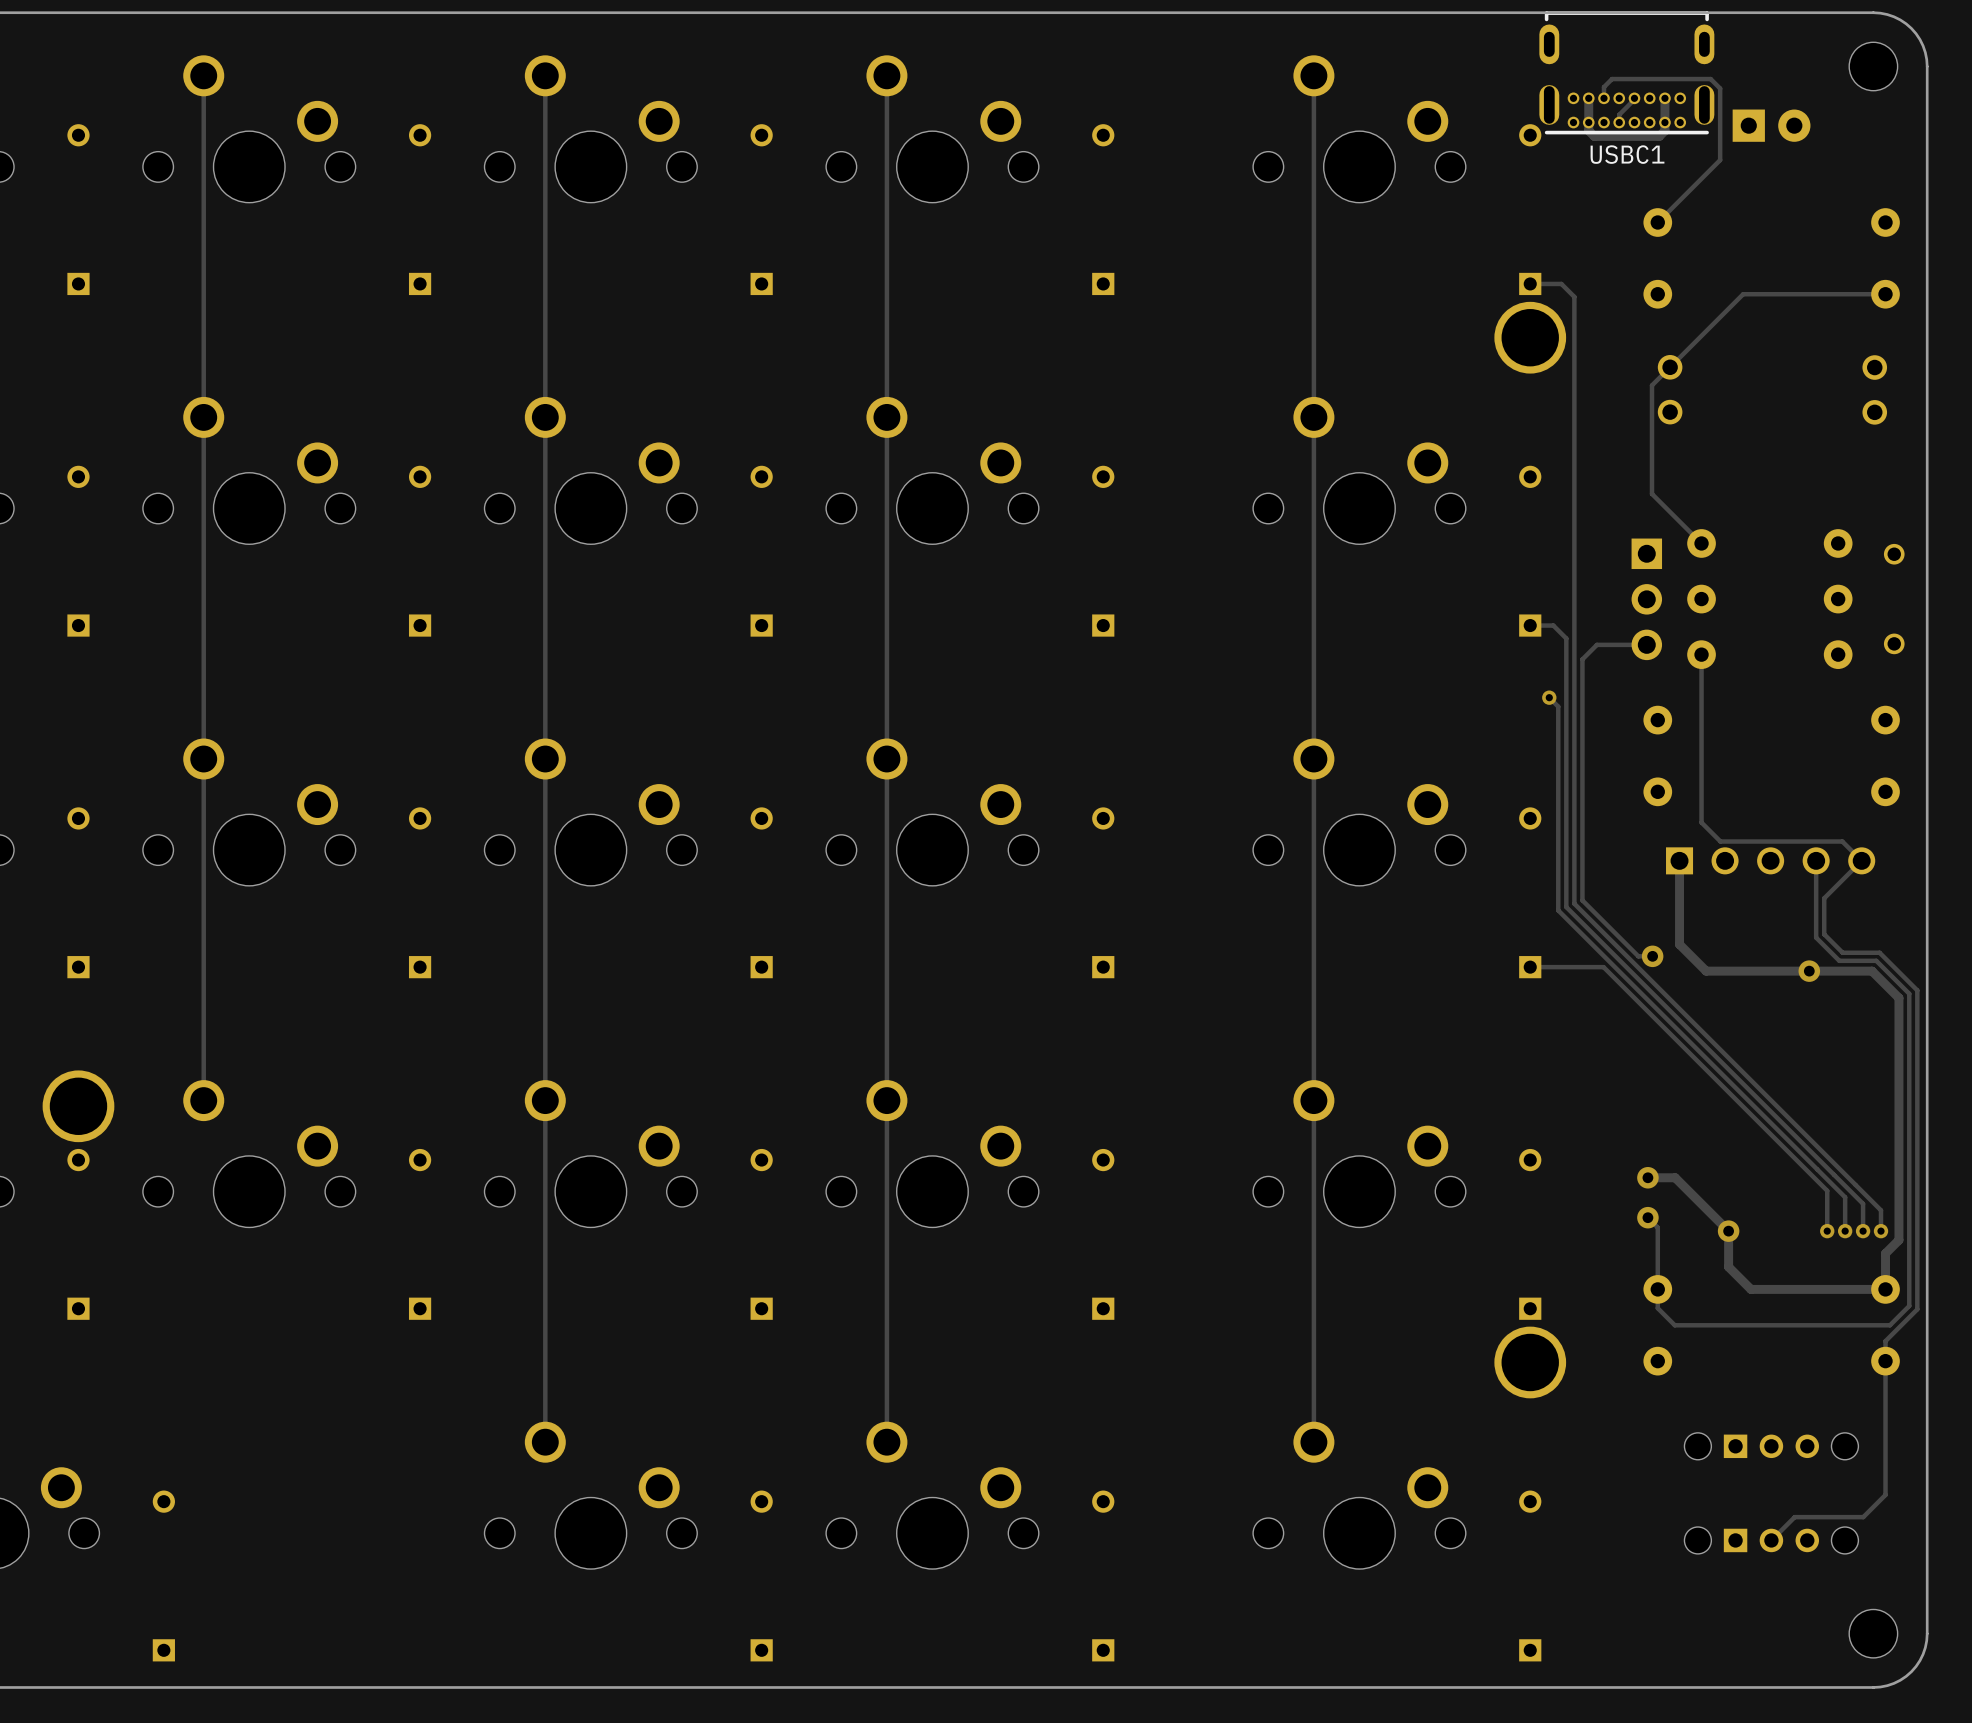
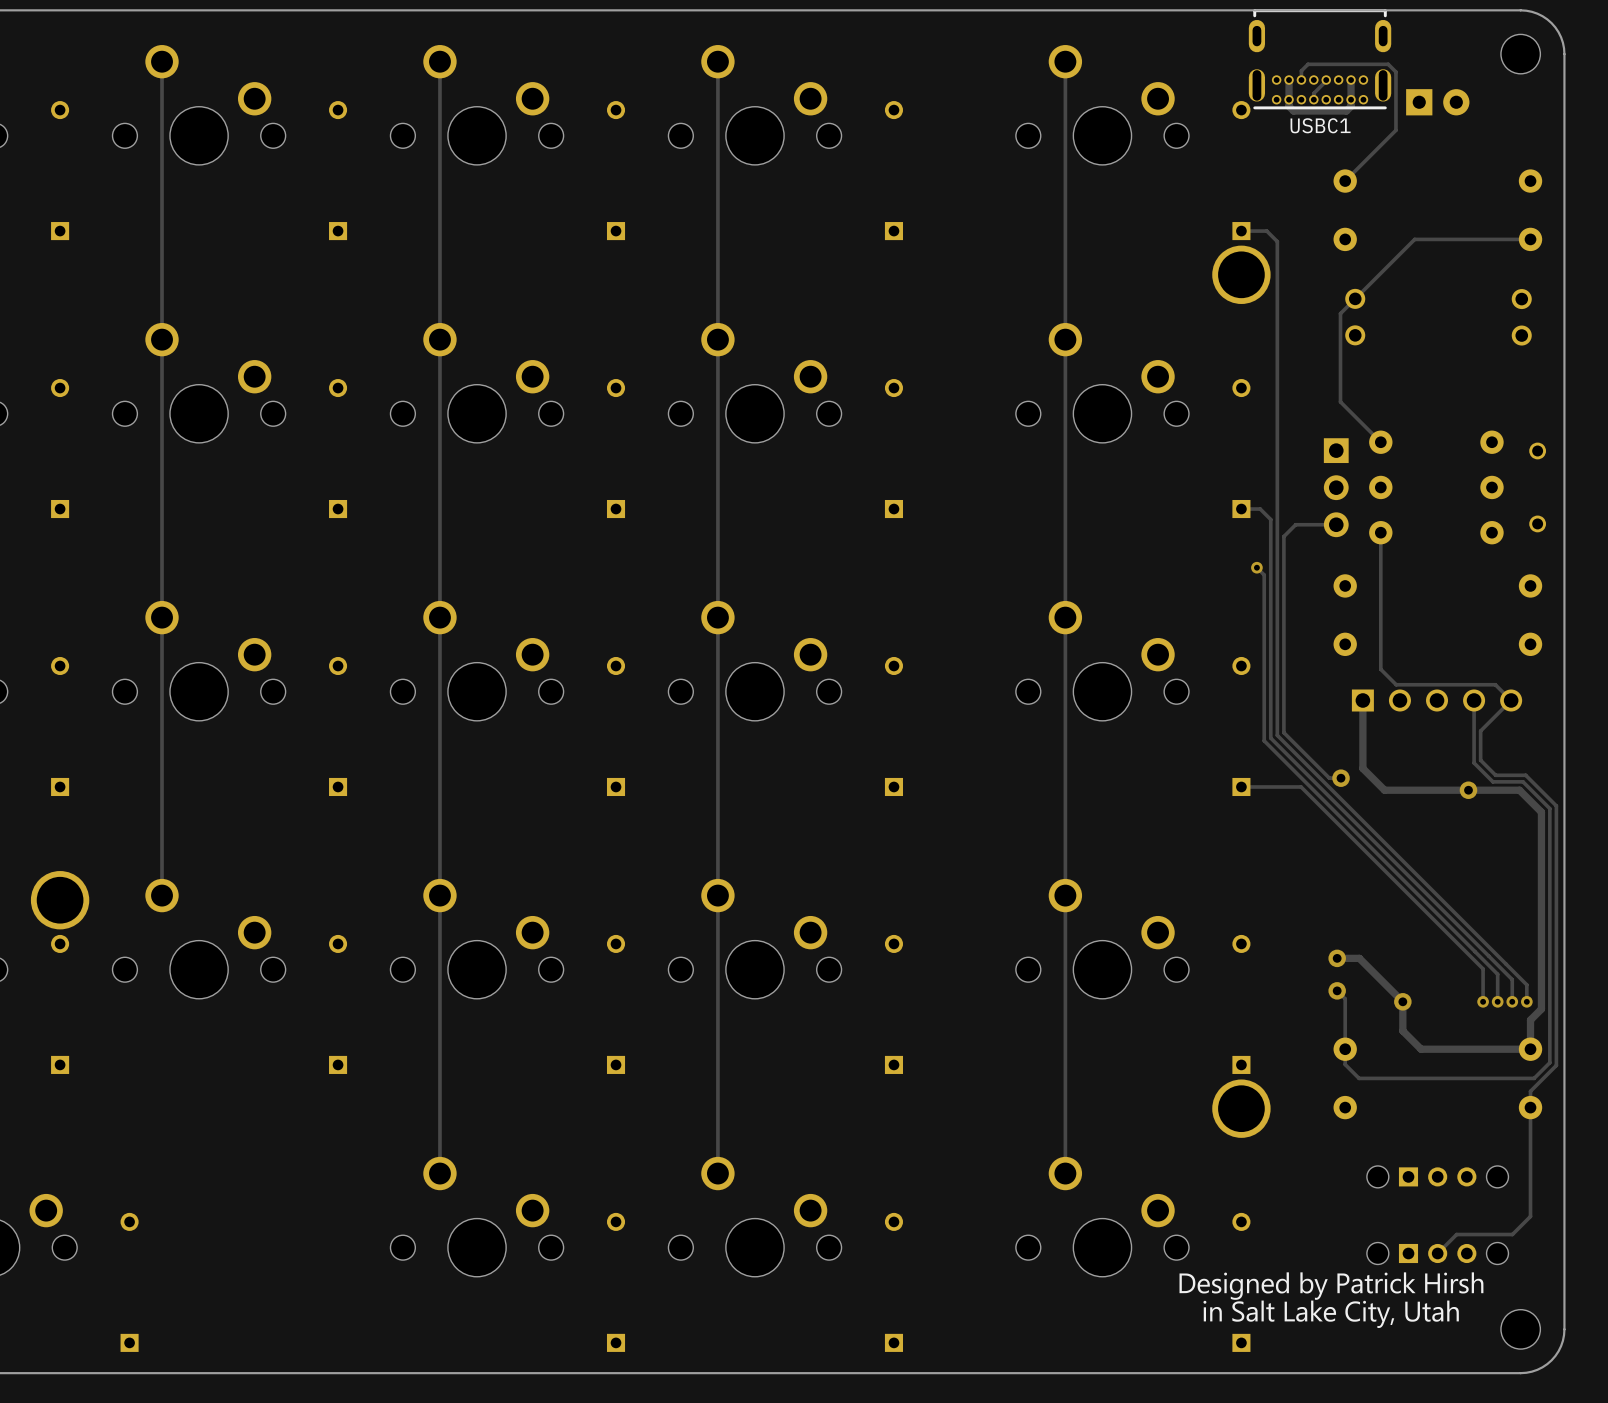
drawing: none -> [1179, 1272, 1484, 1329]

